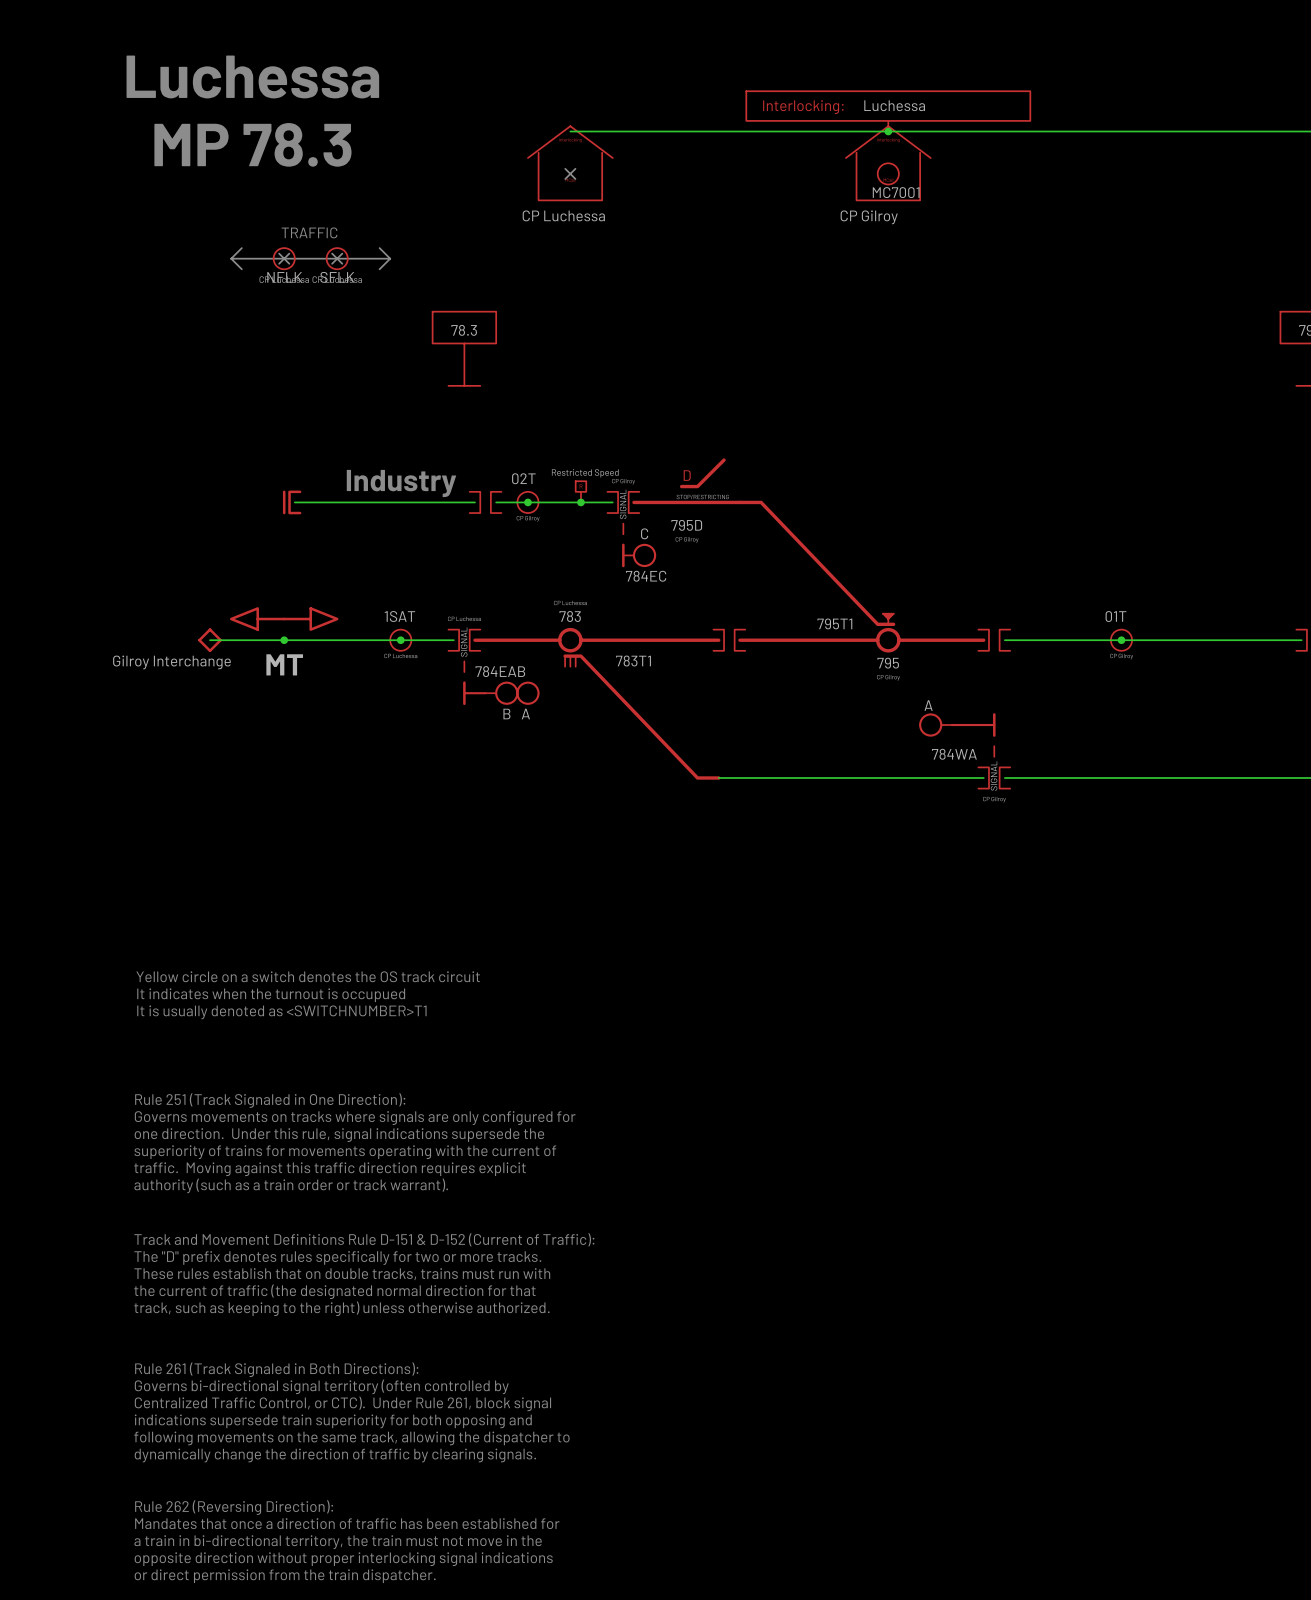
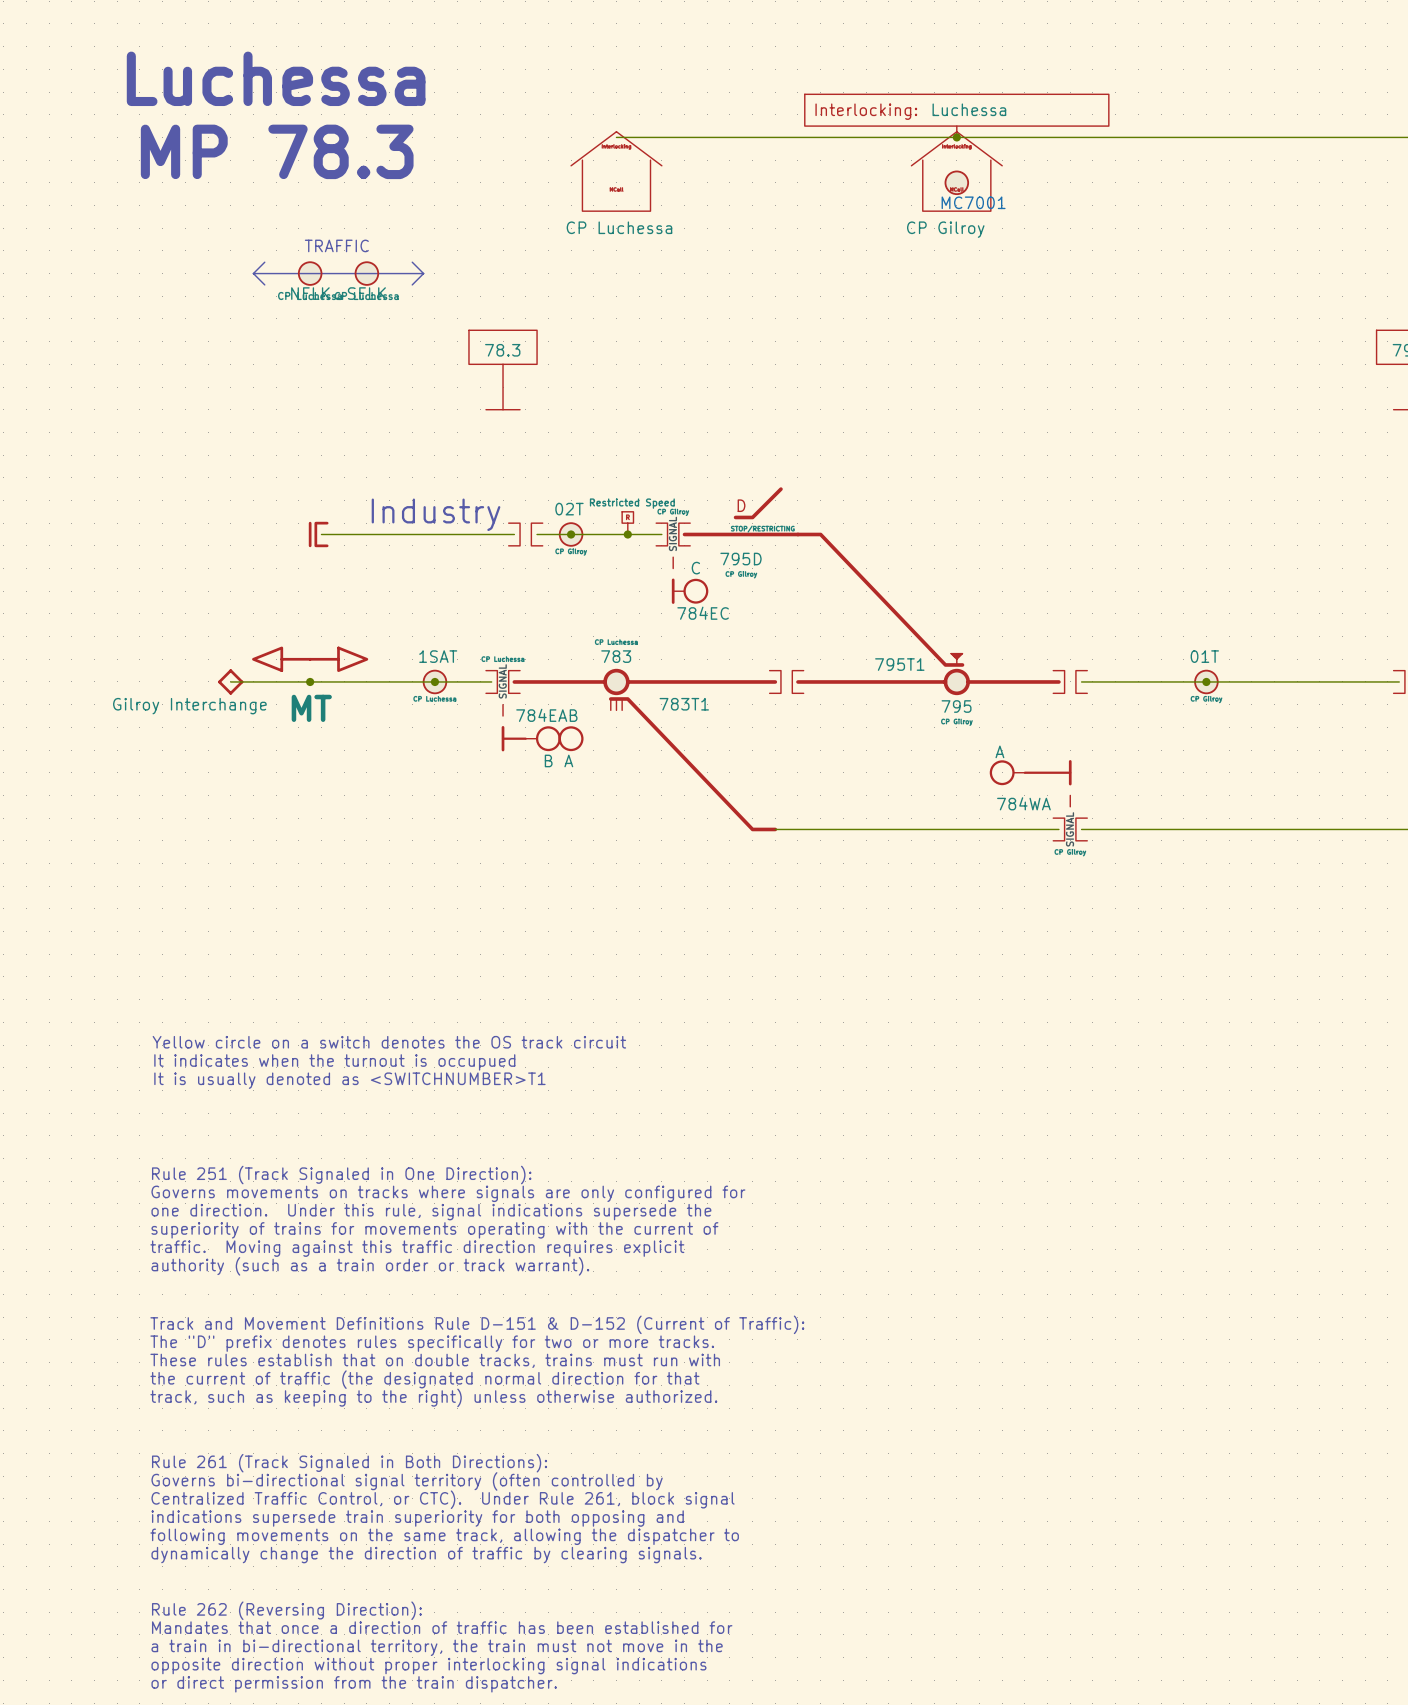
no-connect mark: (570, 173) -> none
no-connect mark: (284, 258) -> none
no-connect mark: (337, 258) -> none

